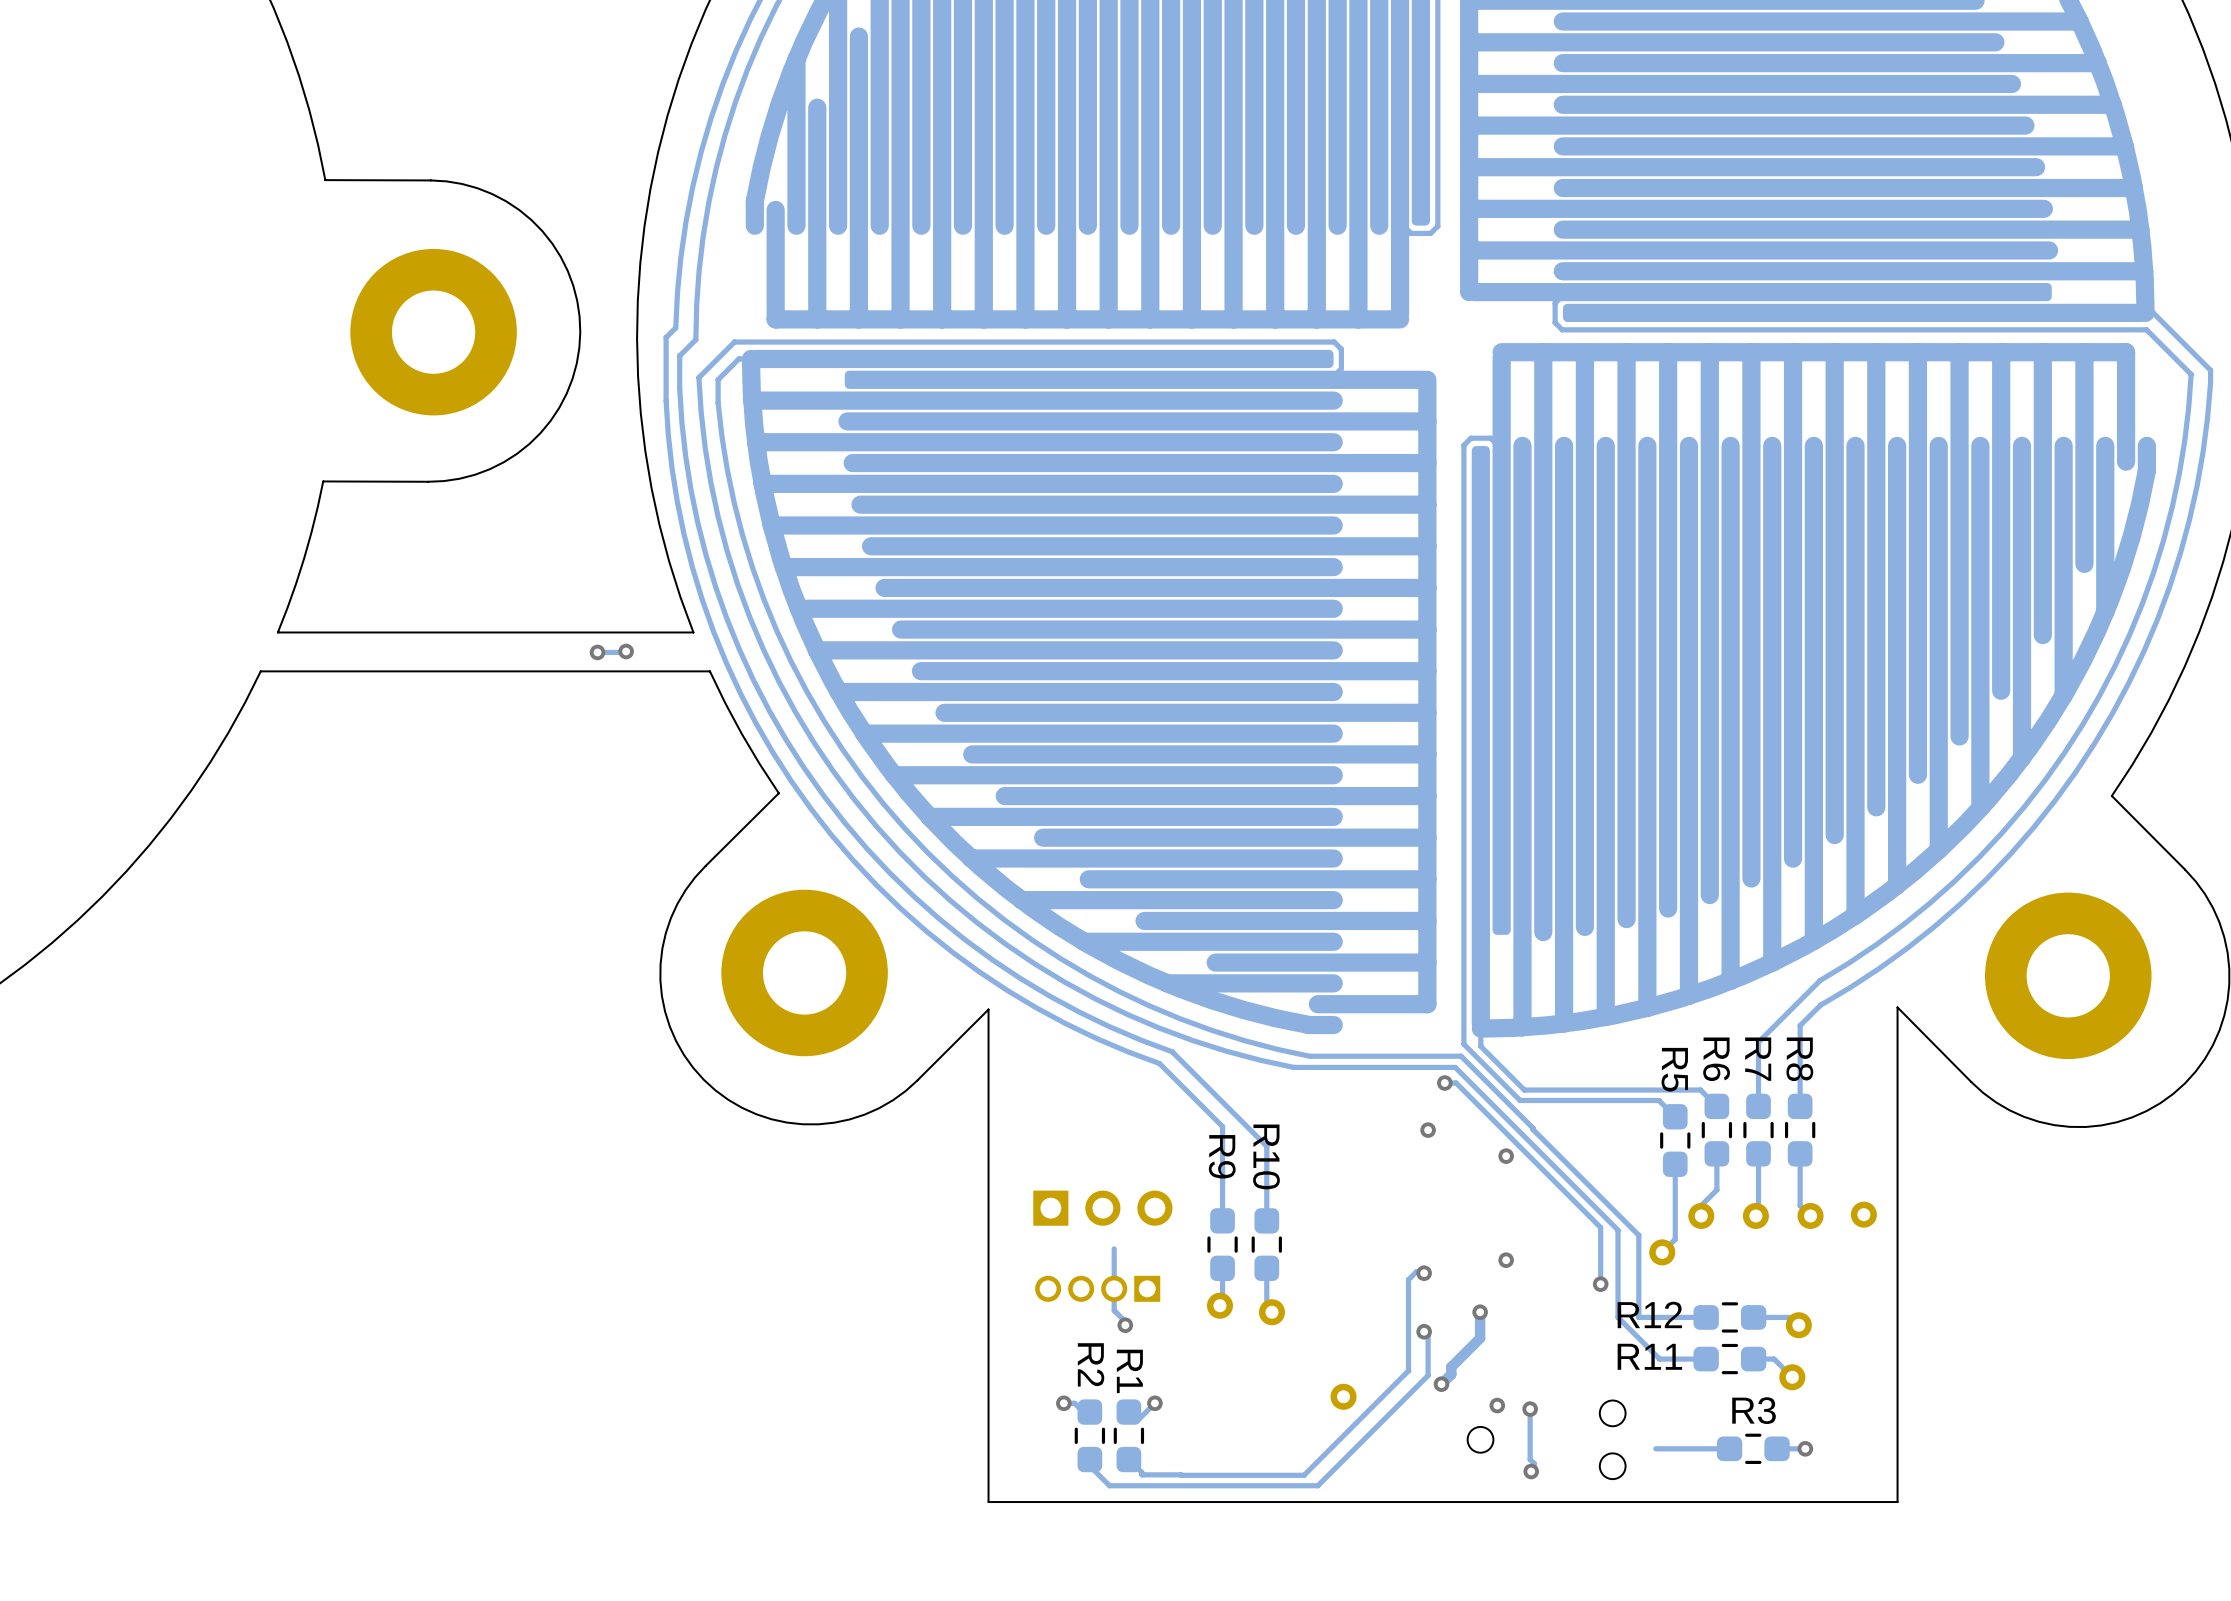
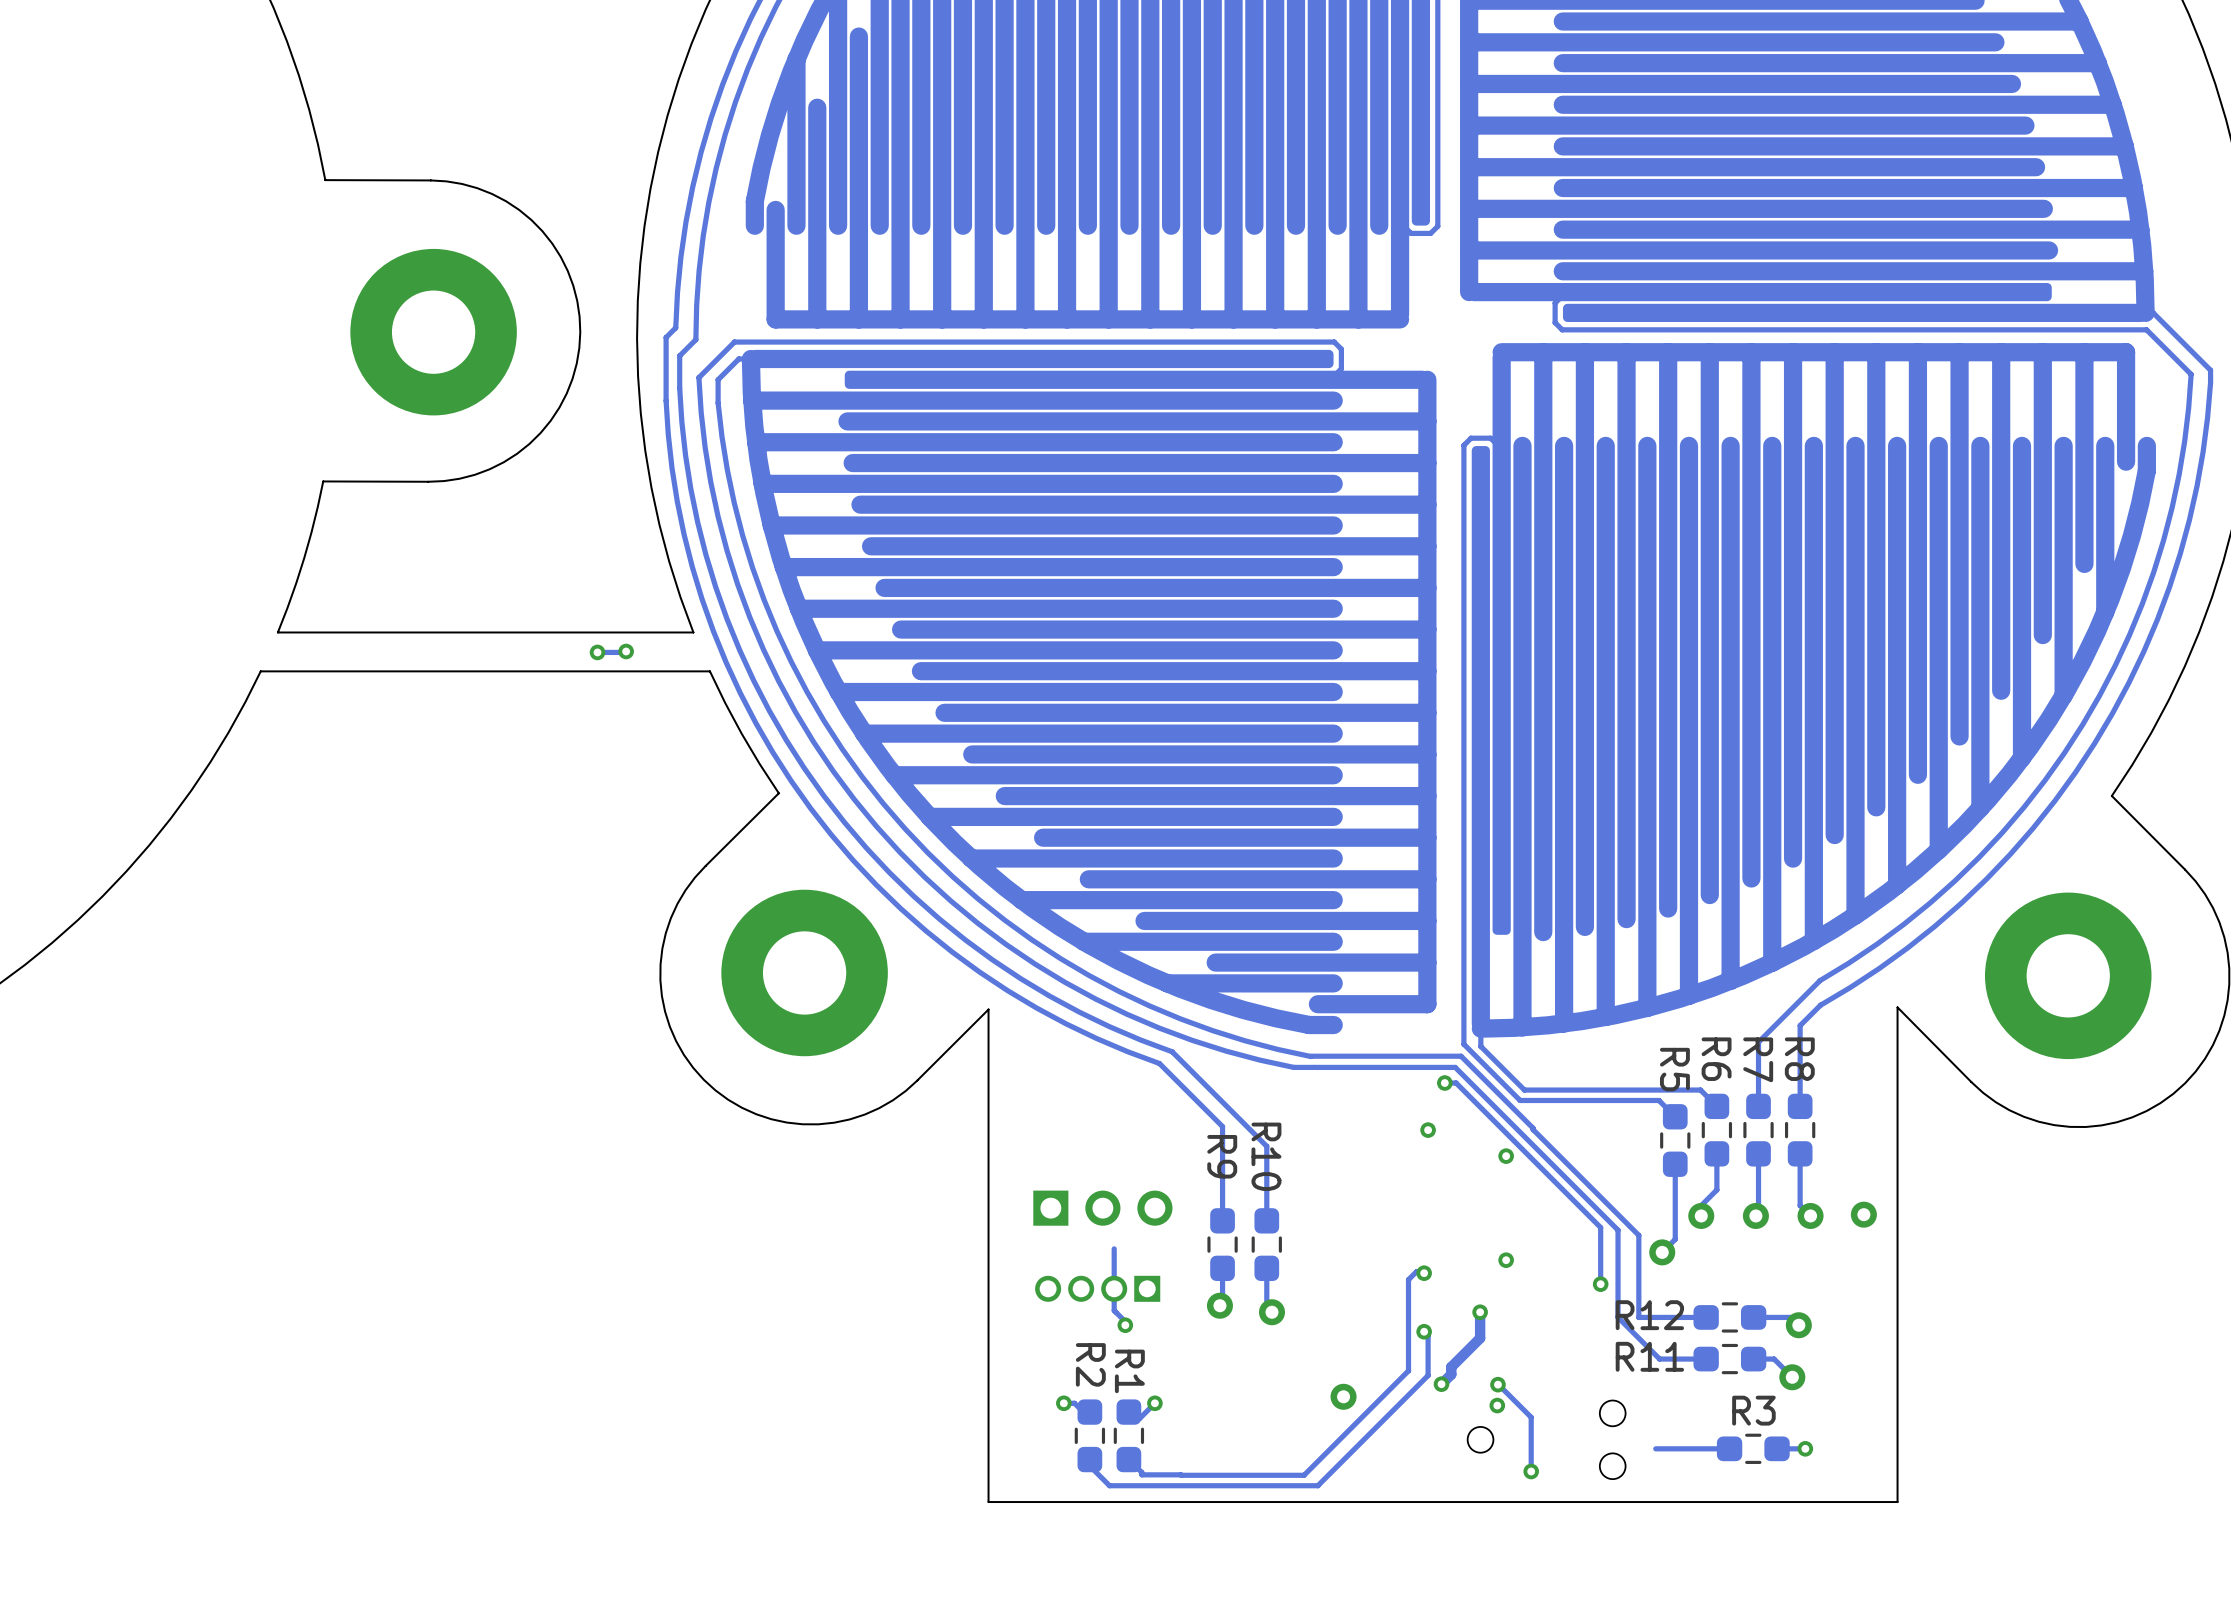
track: none -> (1497, 1384) (1531, 1417) (1531, 1471)
track: (1530, 1409) (1530, 1459) (1534, 1463) (1534, 1468) -> none
via position: (1530, 1409) -> (1497, 1384)

